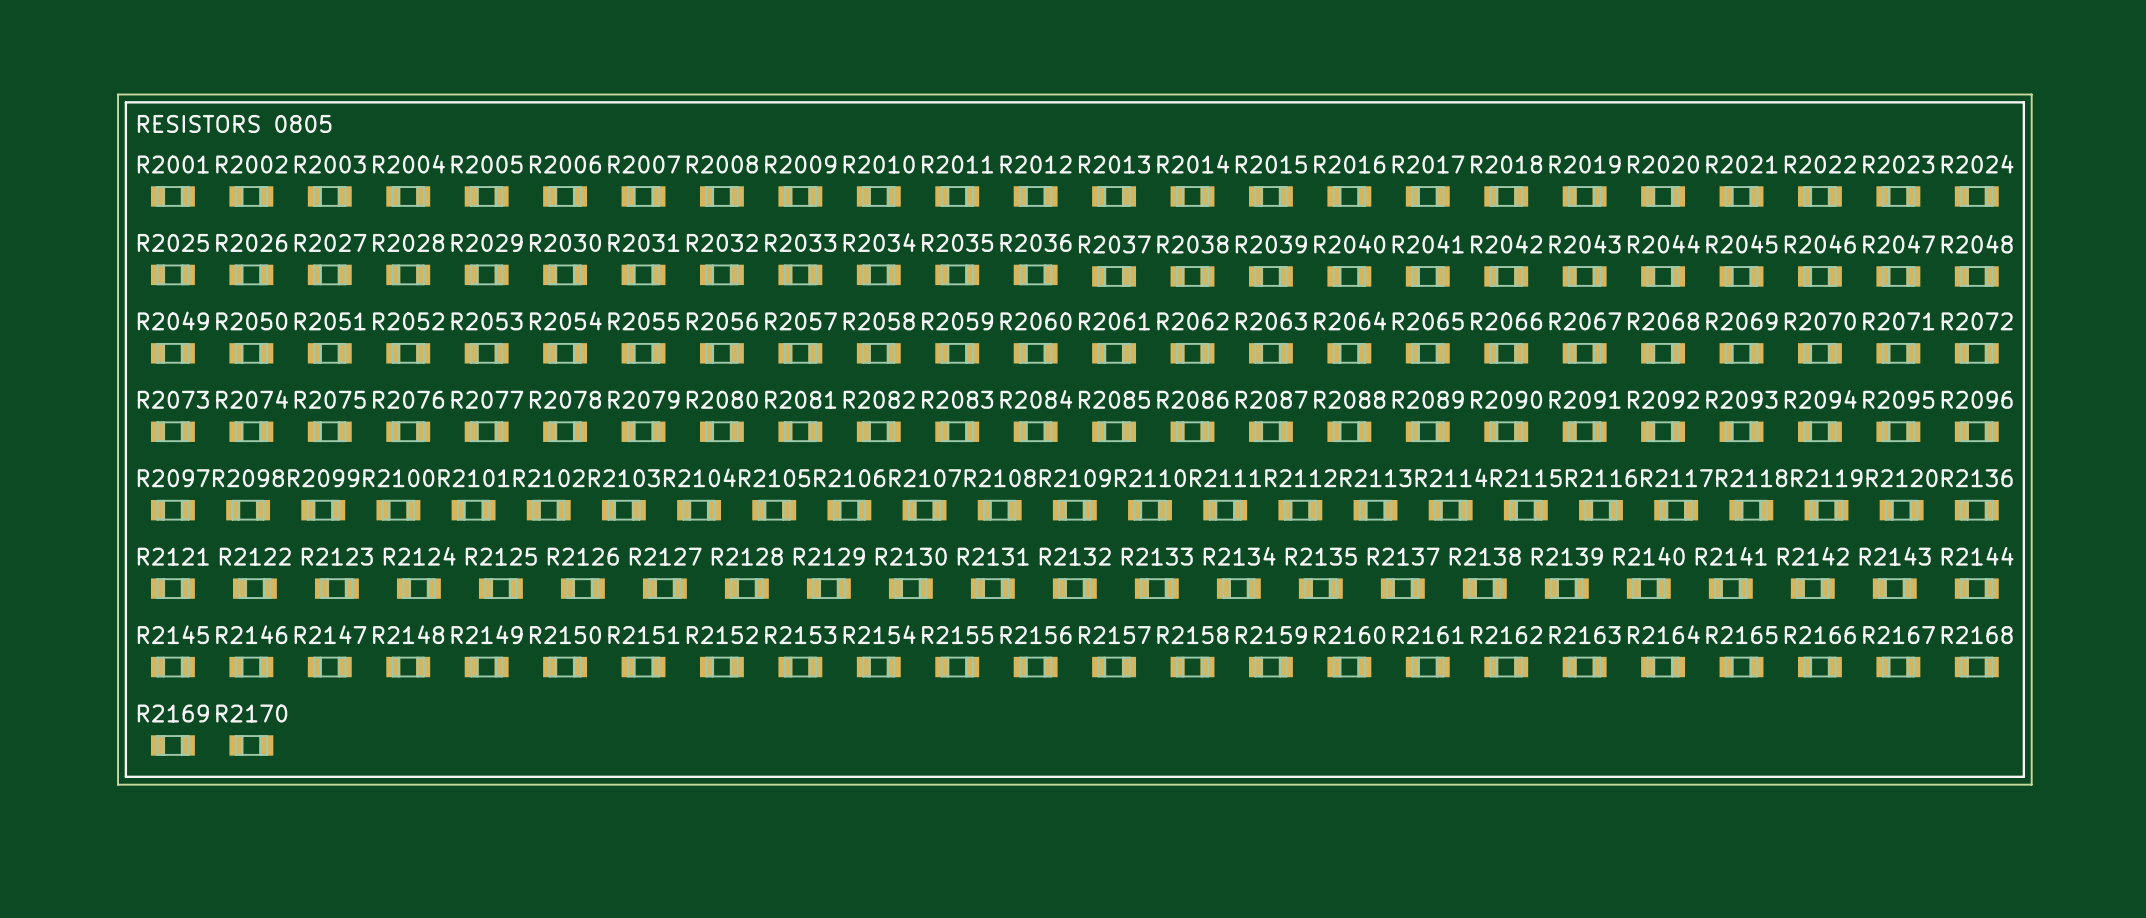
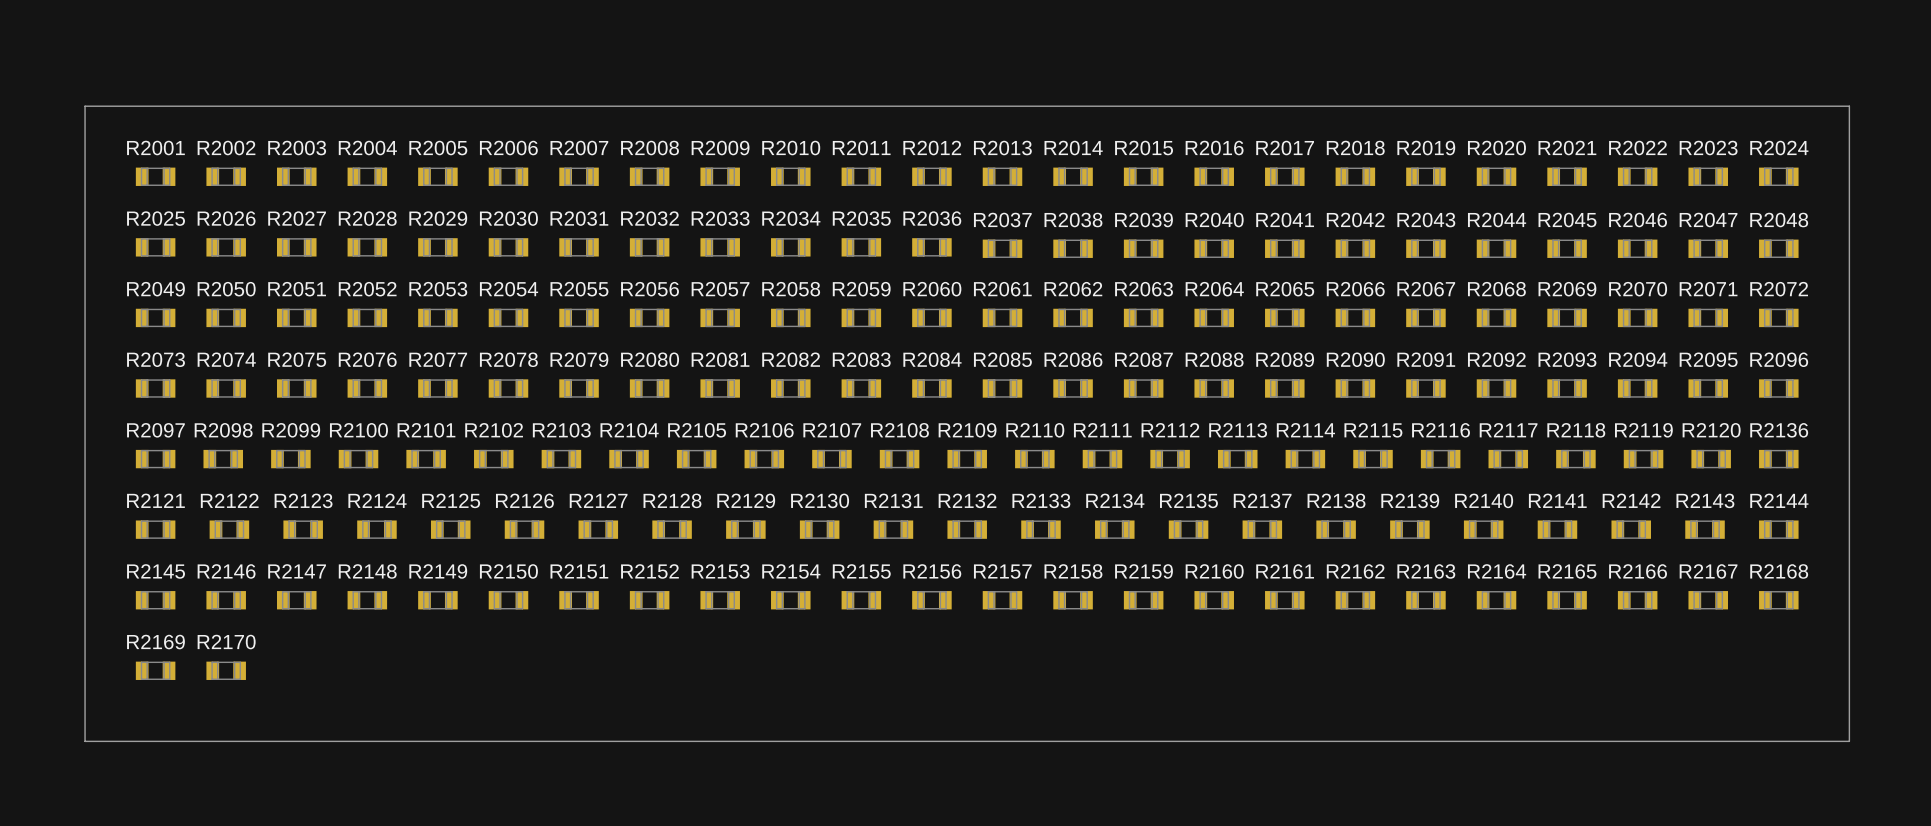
board edge: (118, 94) (2031, 94) (2031, 784) (118, 784) (118, 94) -> (85, 106) (85, 741) (1849, 741) (1849, 106) (85, 106)
line: (125, 102) (2023, 102) (2023, 776) (125, 776) (125, 102) -> none
text: RESISTORS 0805 (234, 123) -> none

